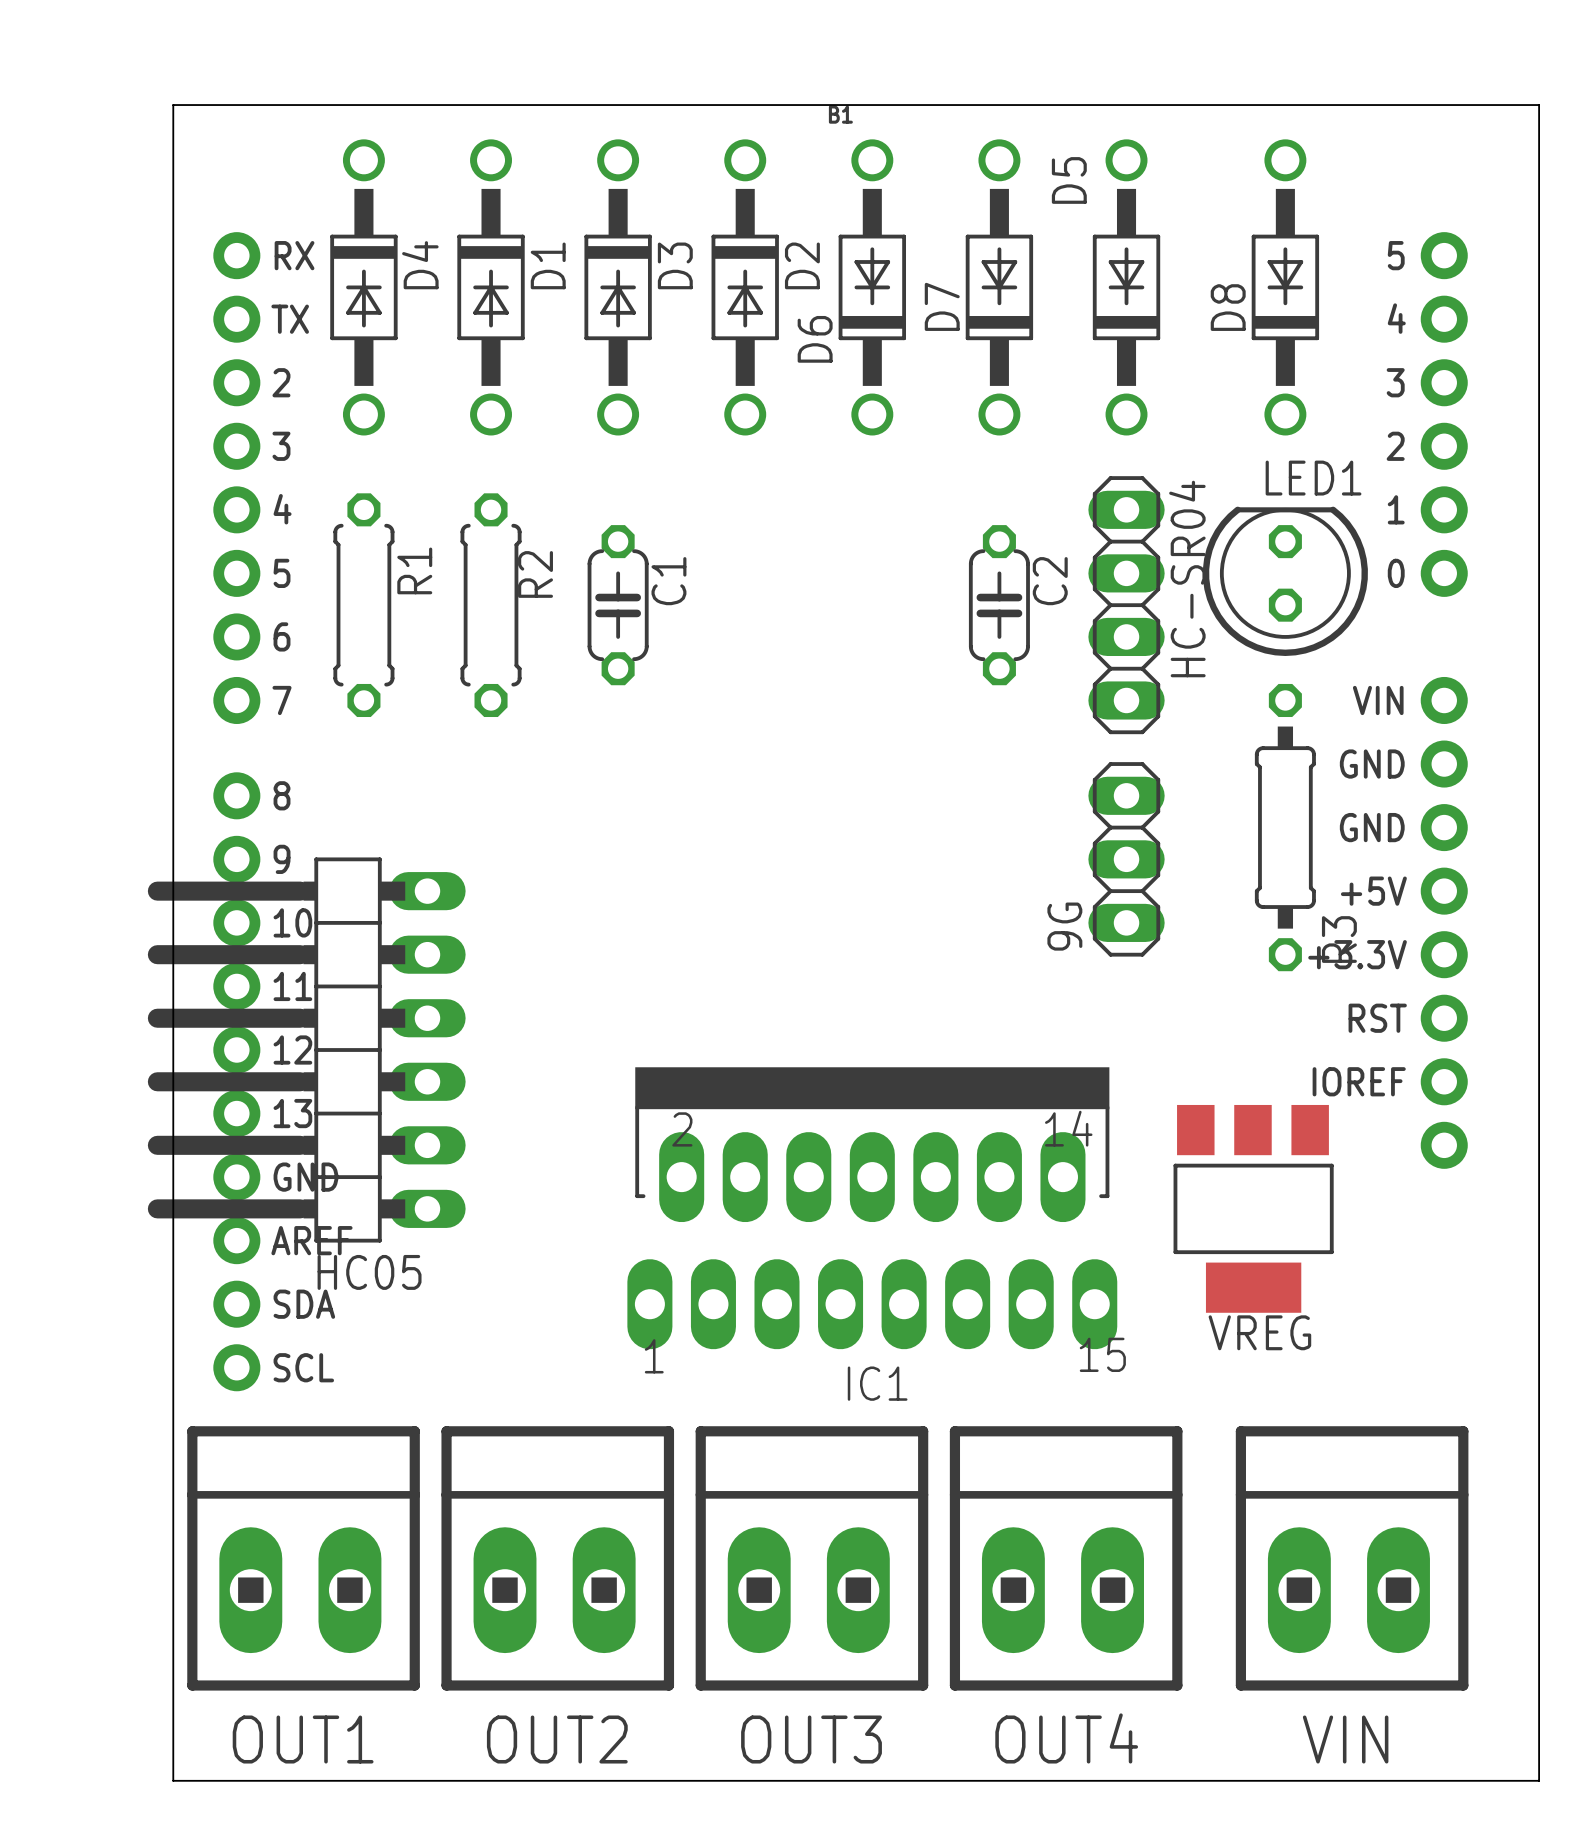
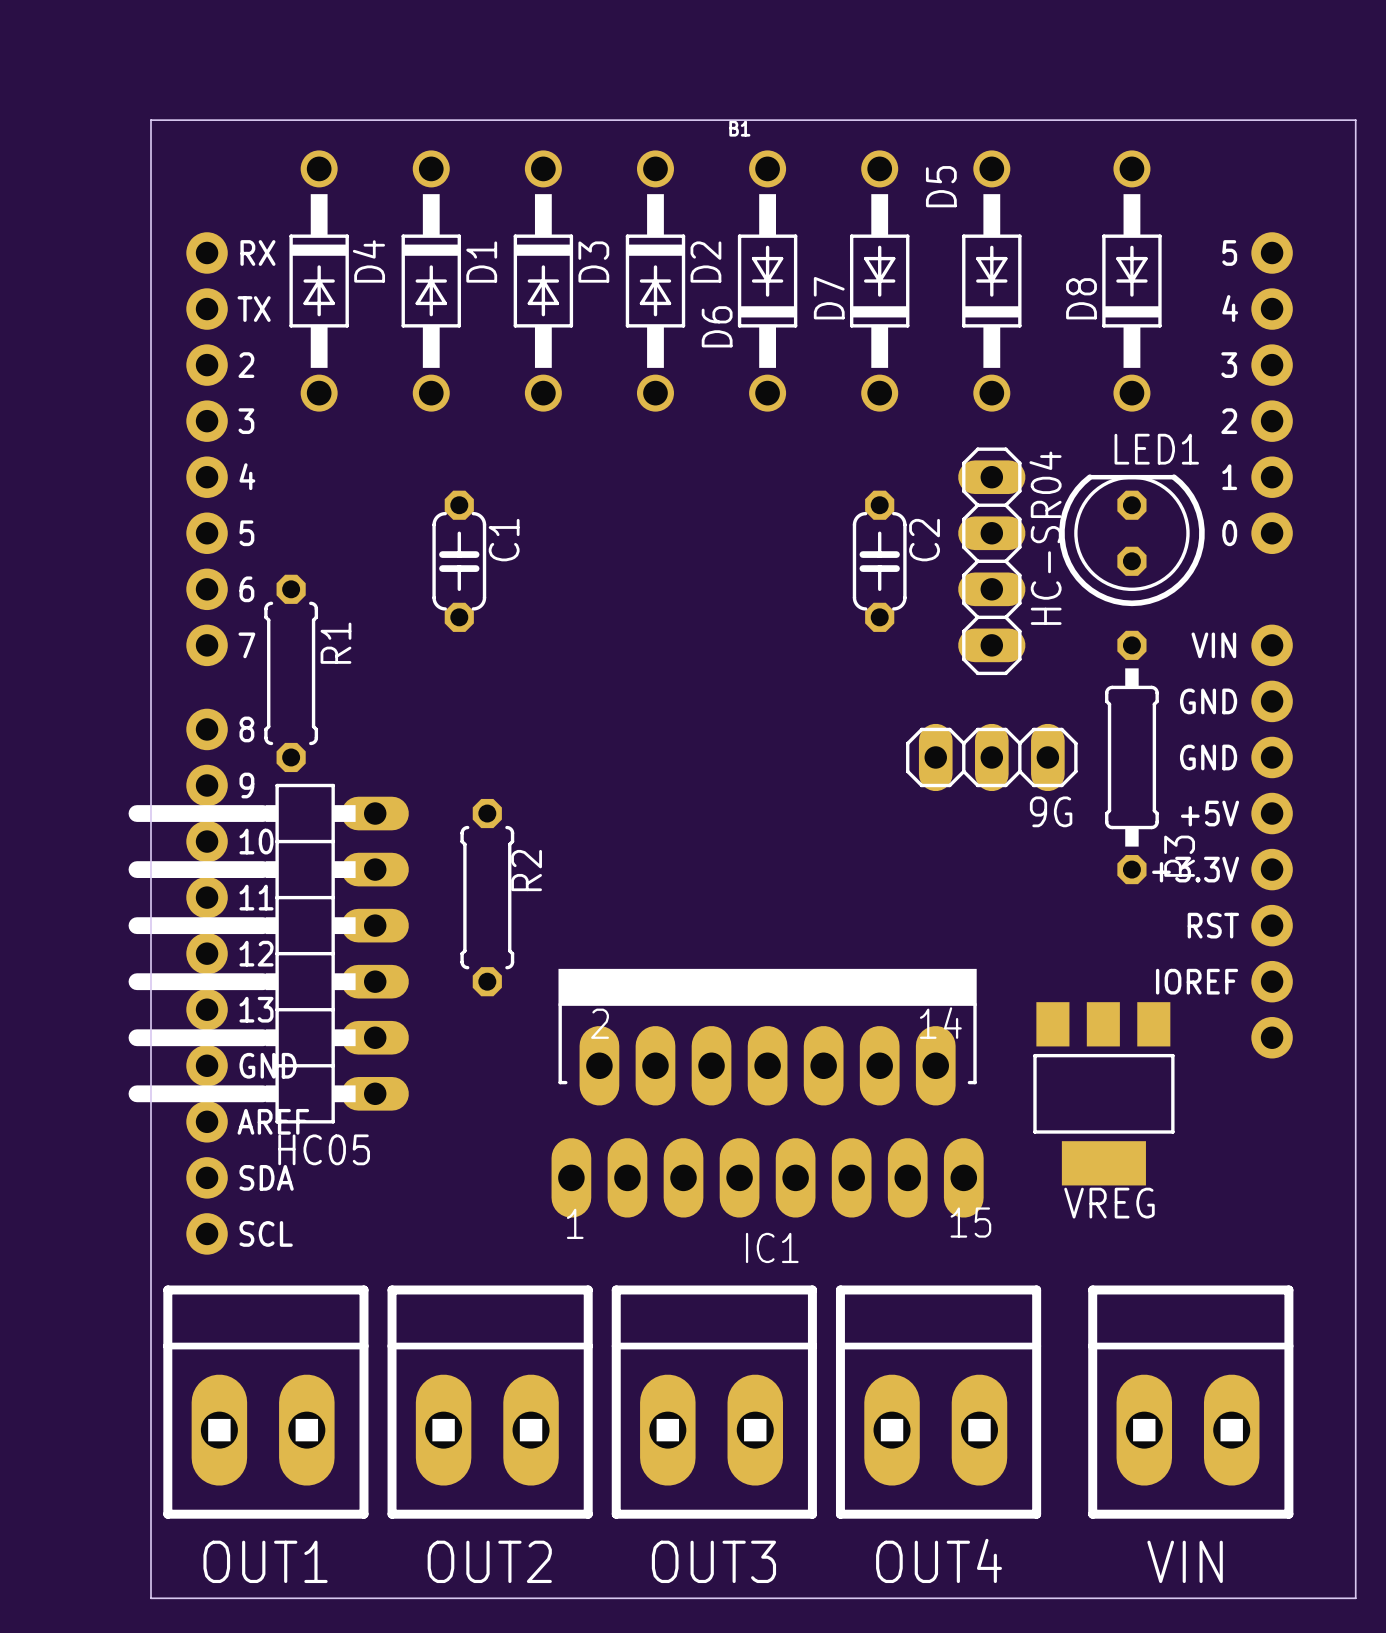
R1 position: (363, 605) -> (291, 673)
R2 position: (491, 605) -> (487, 897)
C1 position: (618, 605) -> (459, 561)
9G rotation: 0° (1126, 859) -> 90° clockwise (991, 757)
9G name position: 9G (1064, 926) -> 9G (1051, 811)

